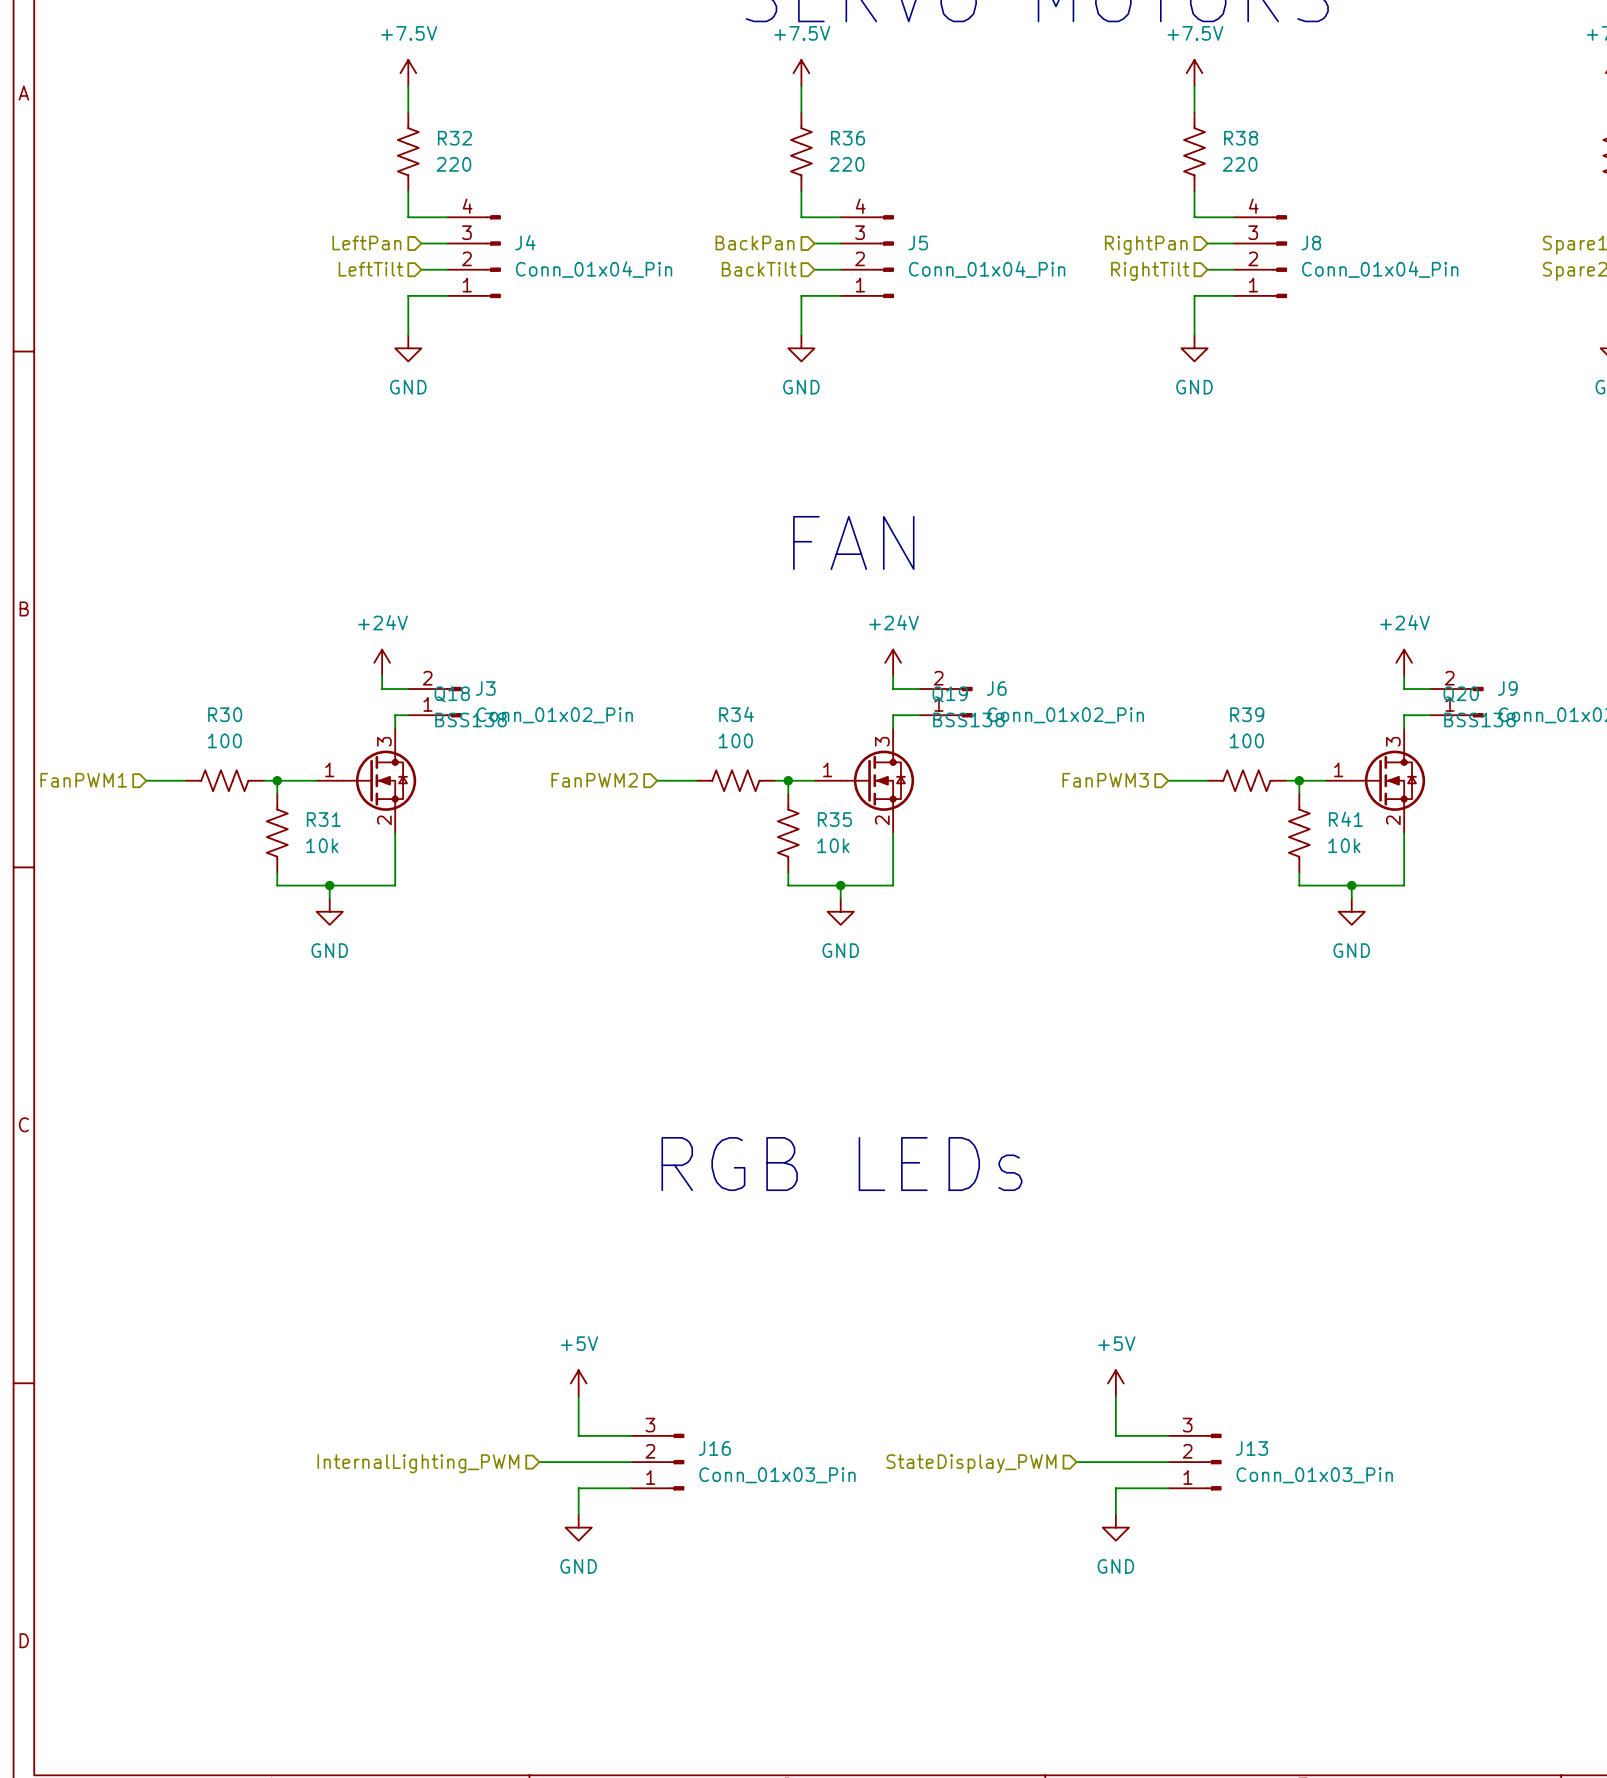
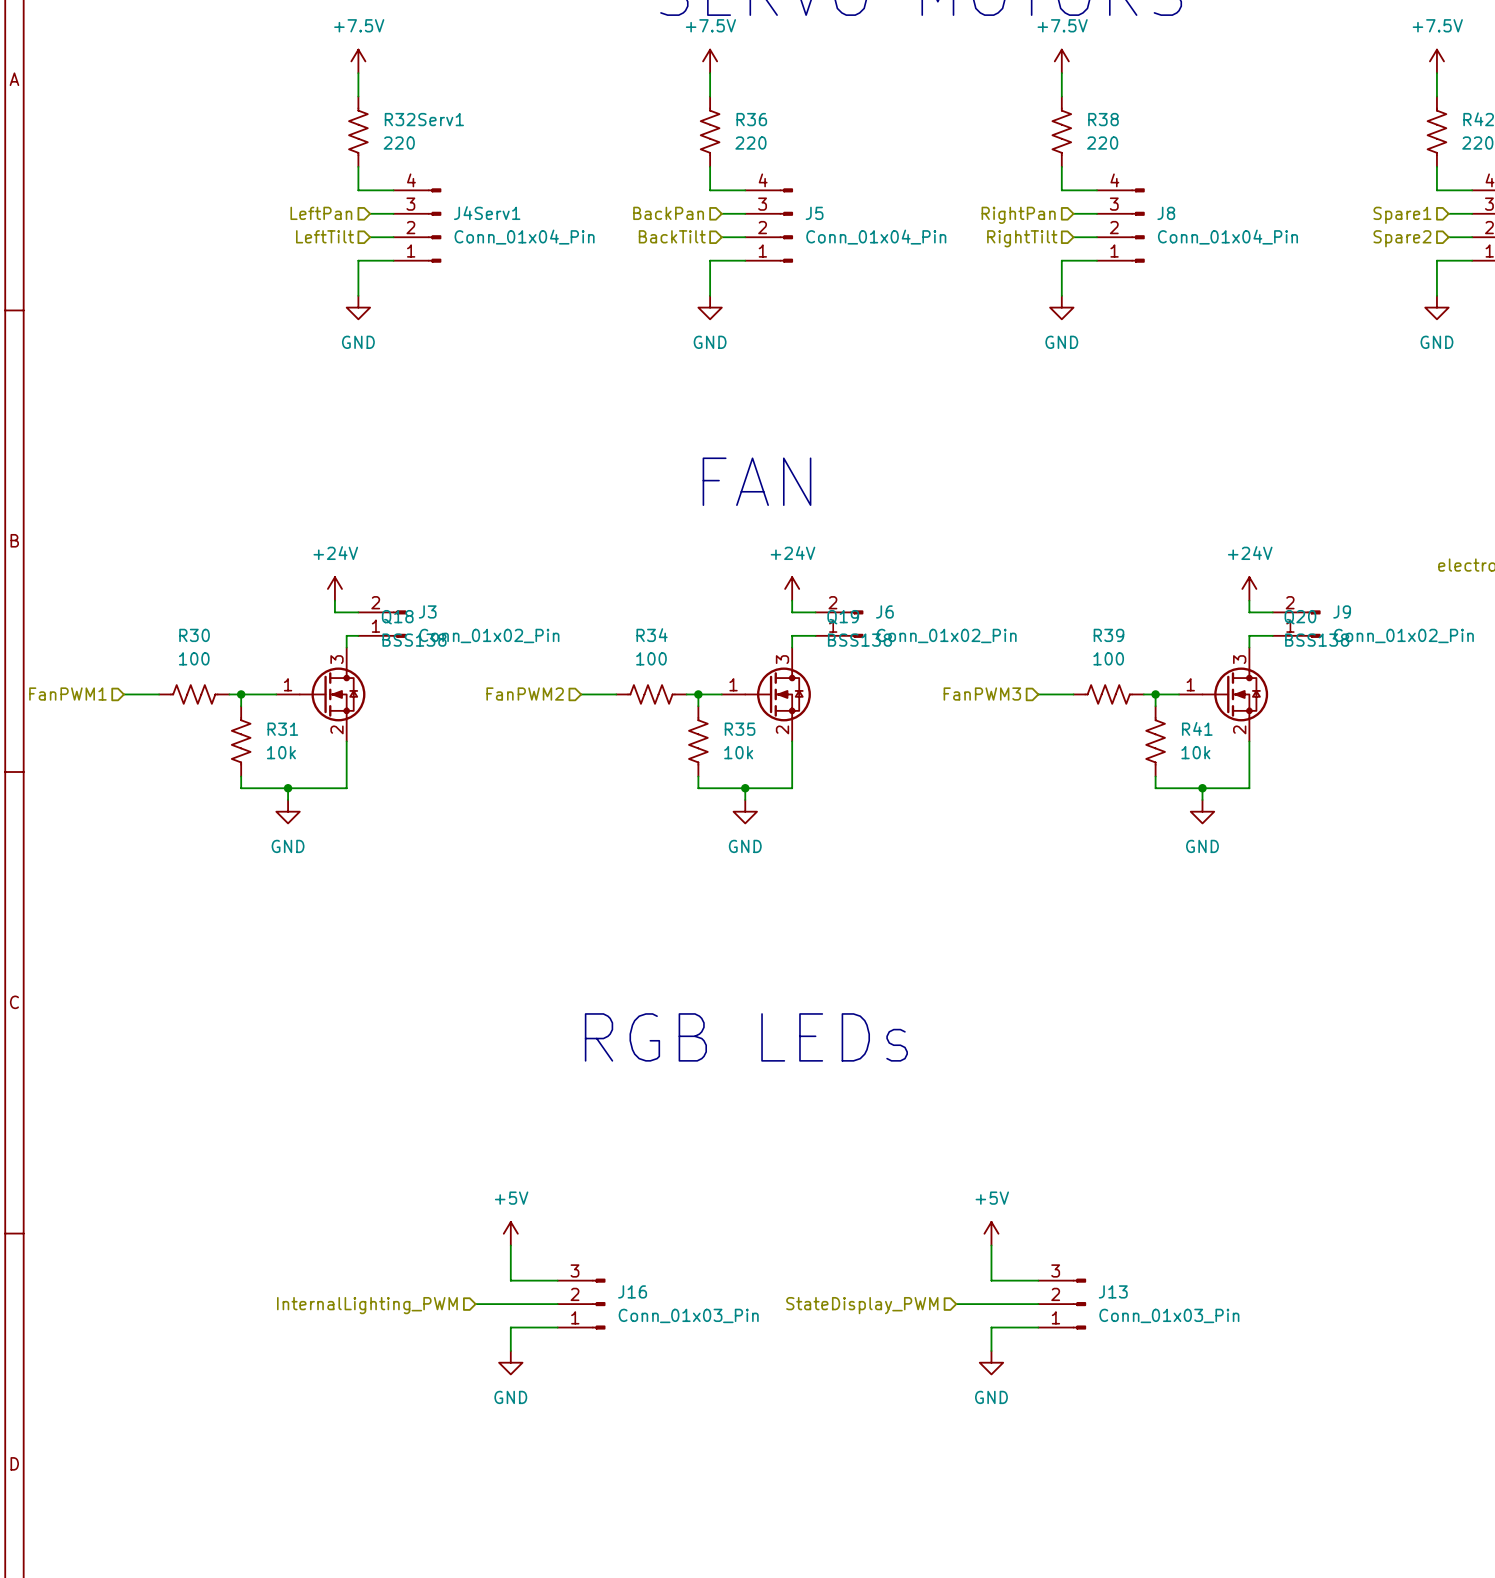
R32 name: R32 (454, 138) -> R32Serv1 (424, 119)
J4 name: J4 (525, 242) -> J4Serv1 (487, 213)

